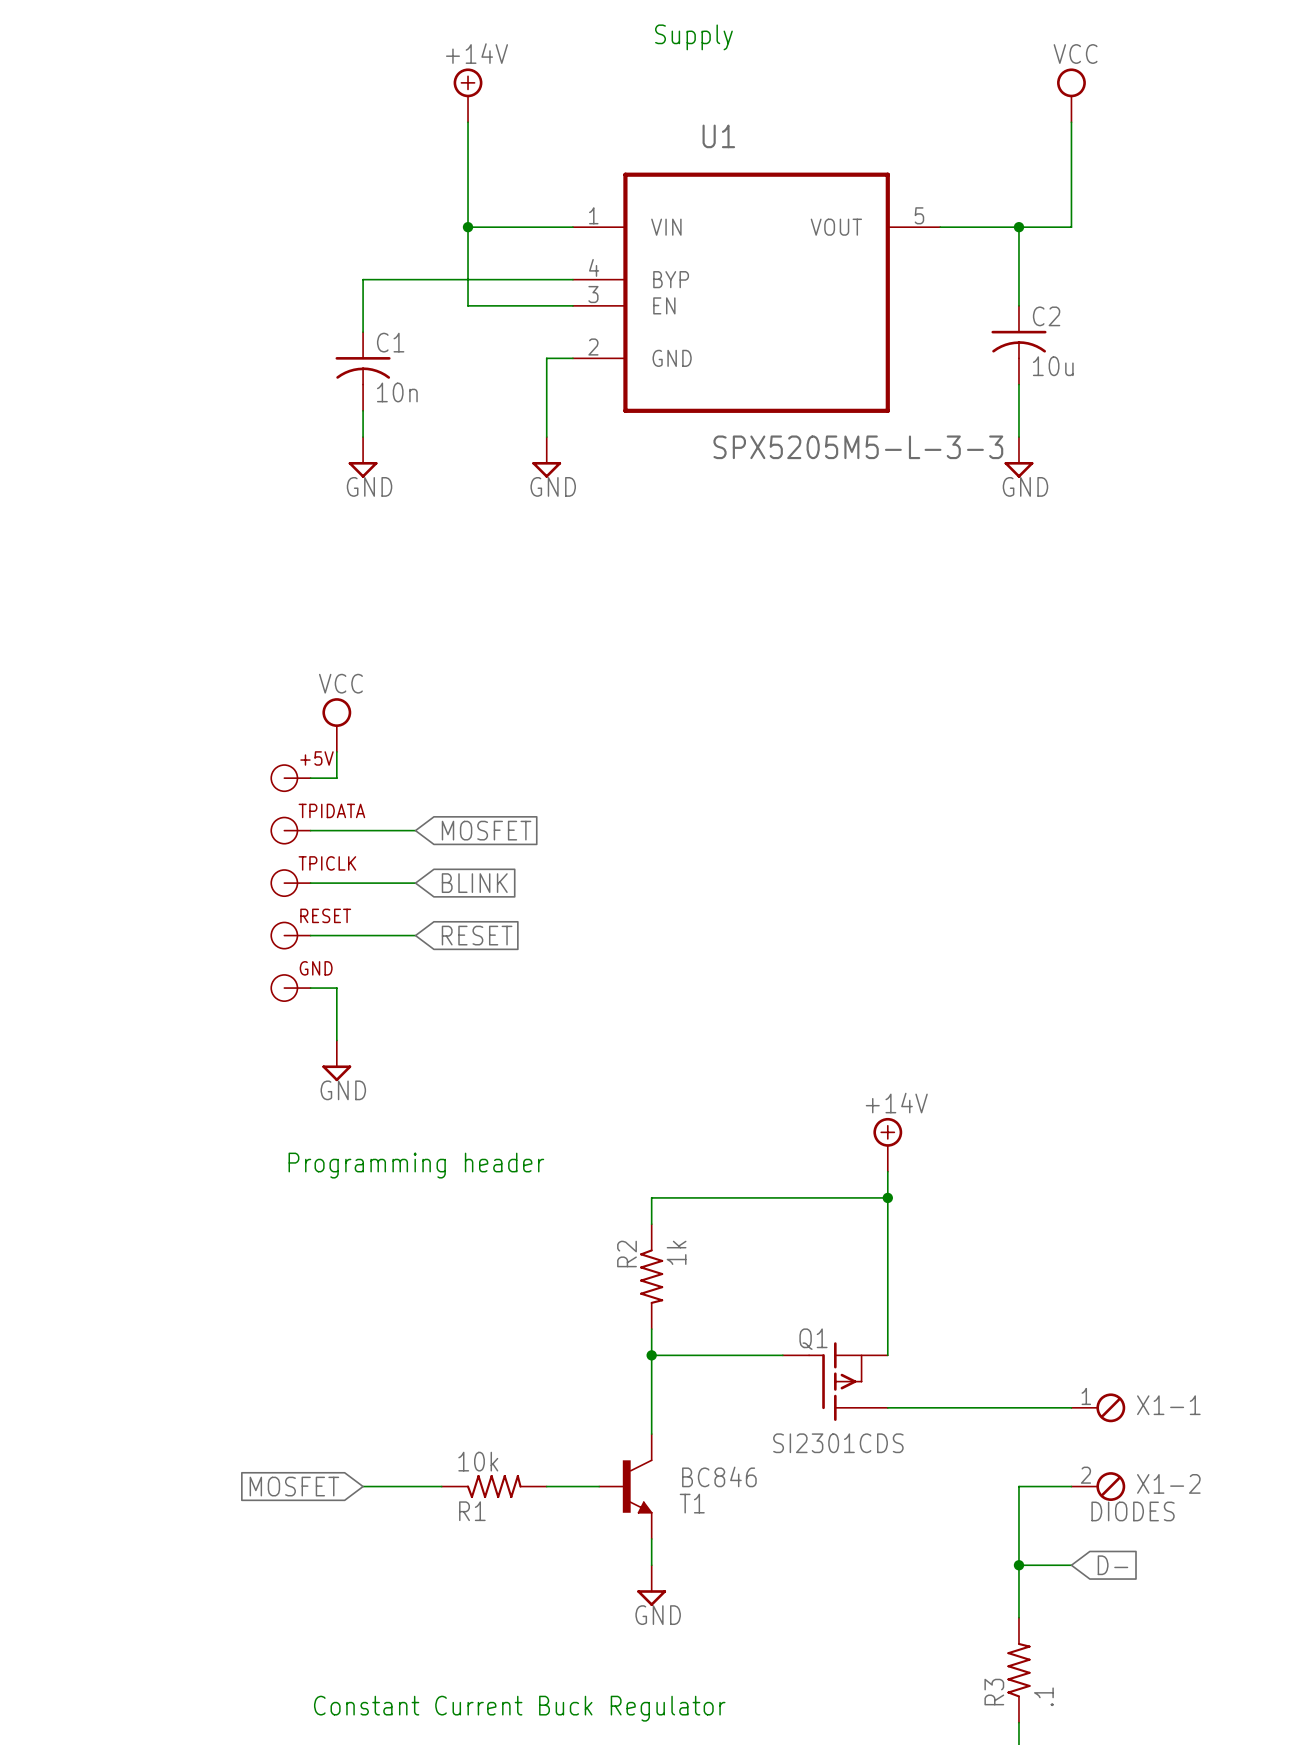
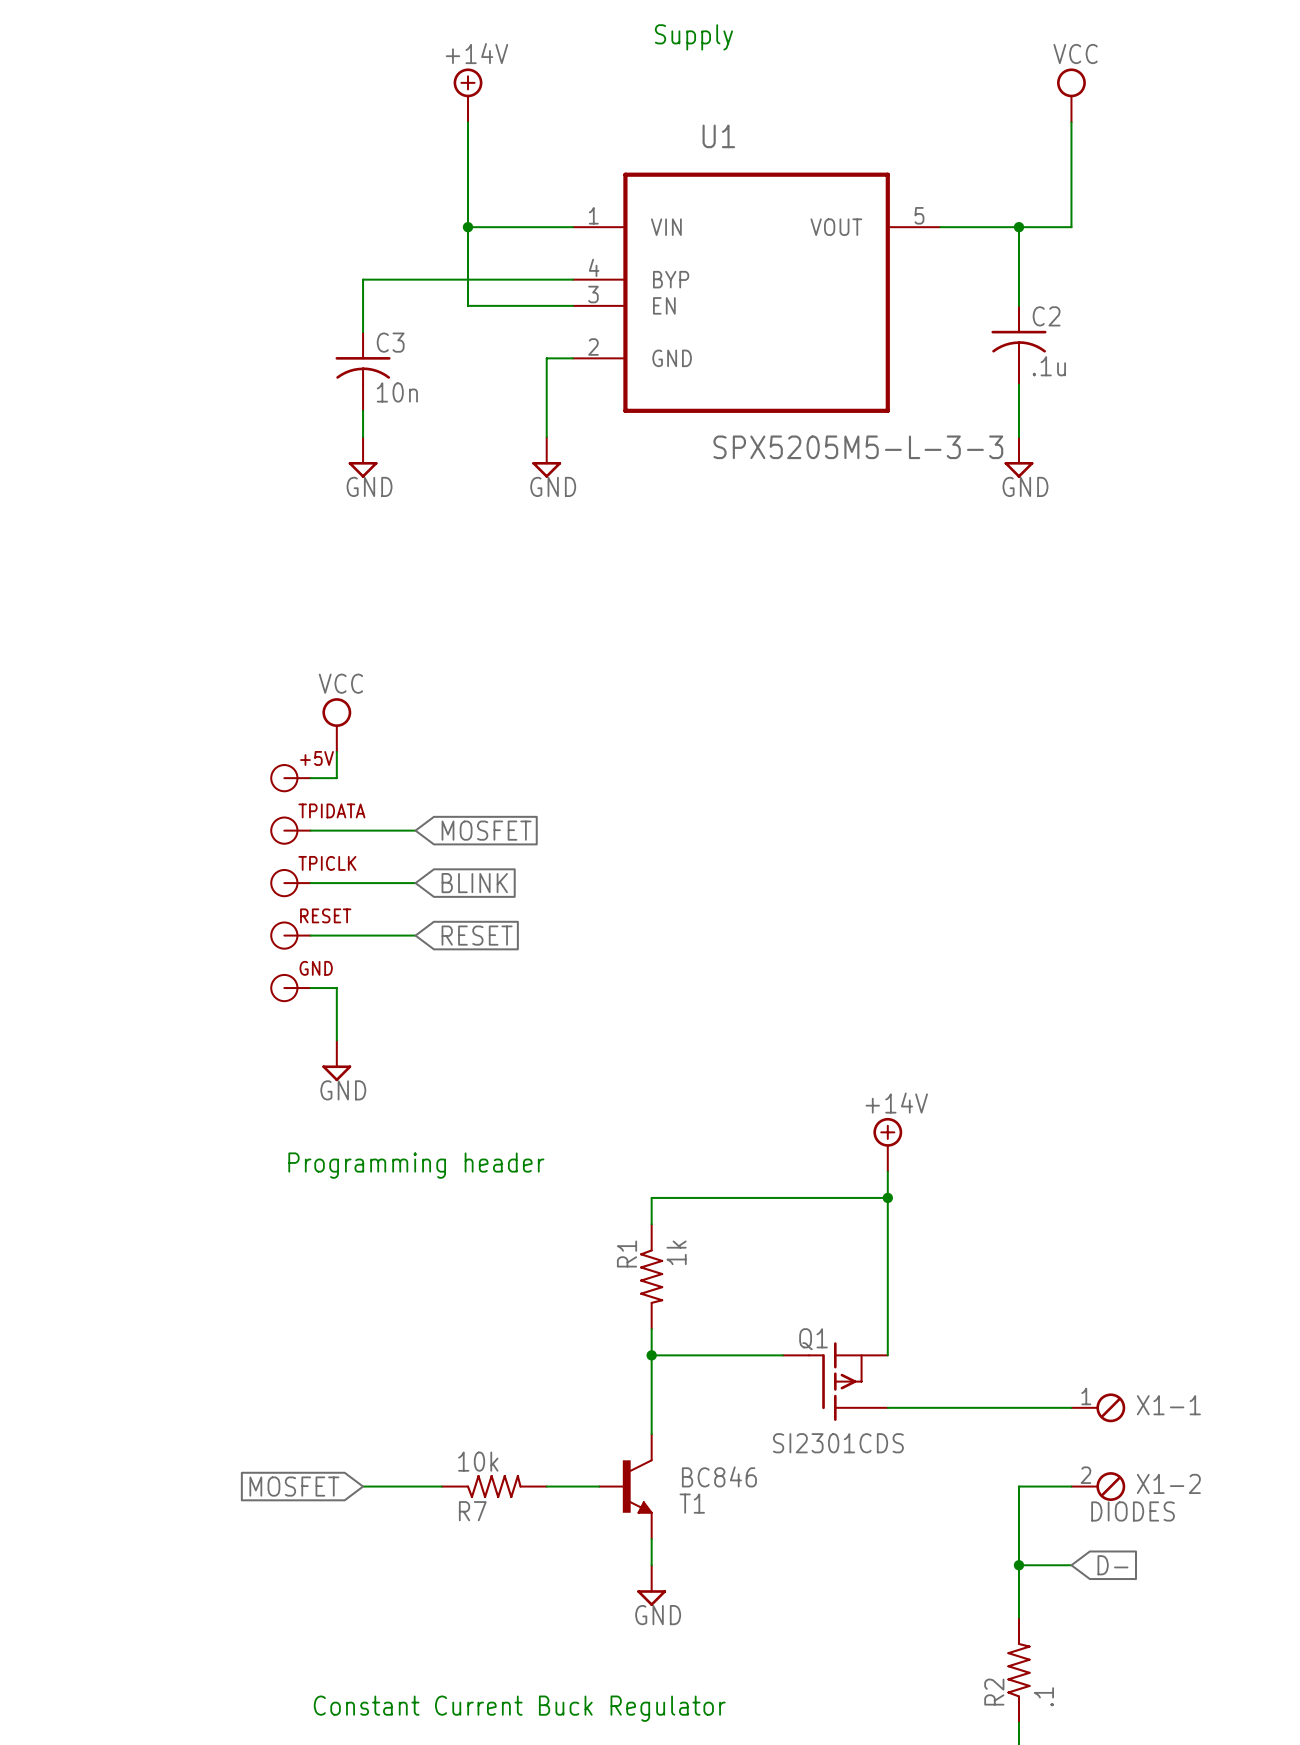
C1 name: C1 (390, 342) -> C3 (390, 342)
C2 value: 10u (1053, 366) -> .1u (1049, 366)
R2 name: R2 (627, 1254) -> R1 (627, 1254)
R1 name: R1 (472, 1511) -> R7 (472, 1511)
R3 name: R3 (994, 1692) -> R2 (994, 1692)

